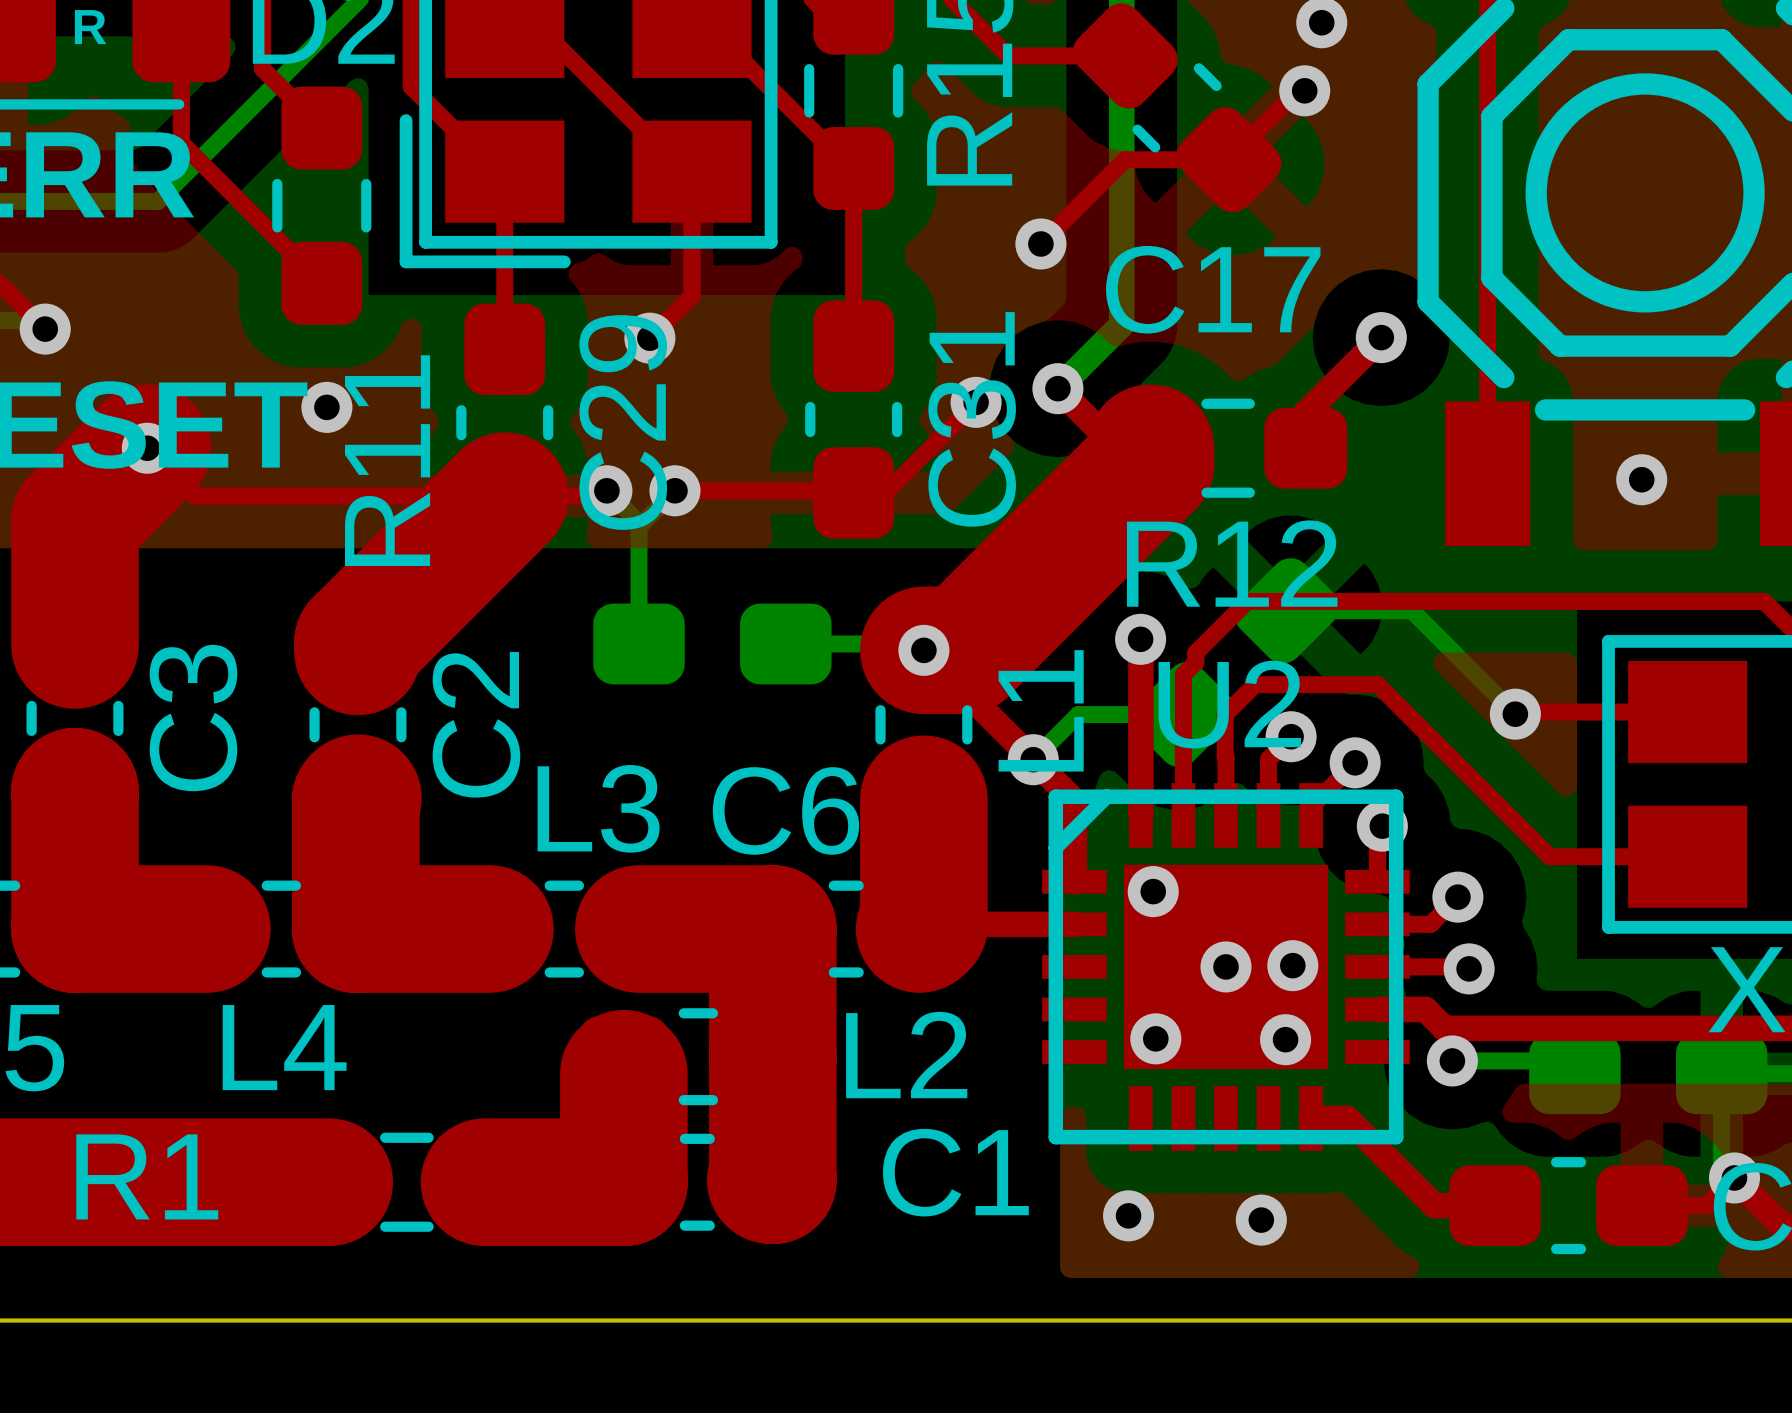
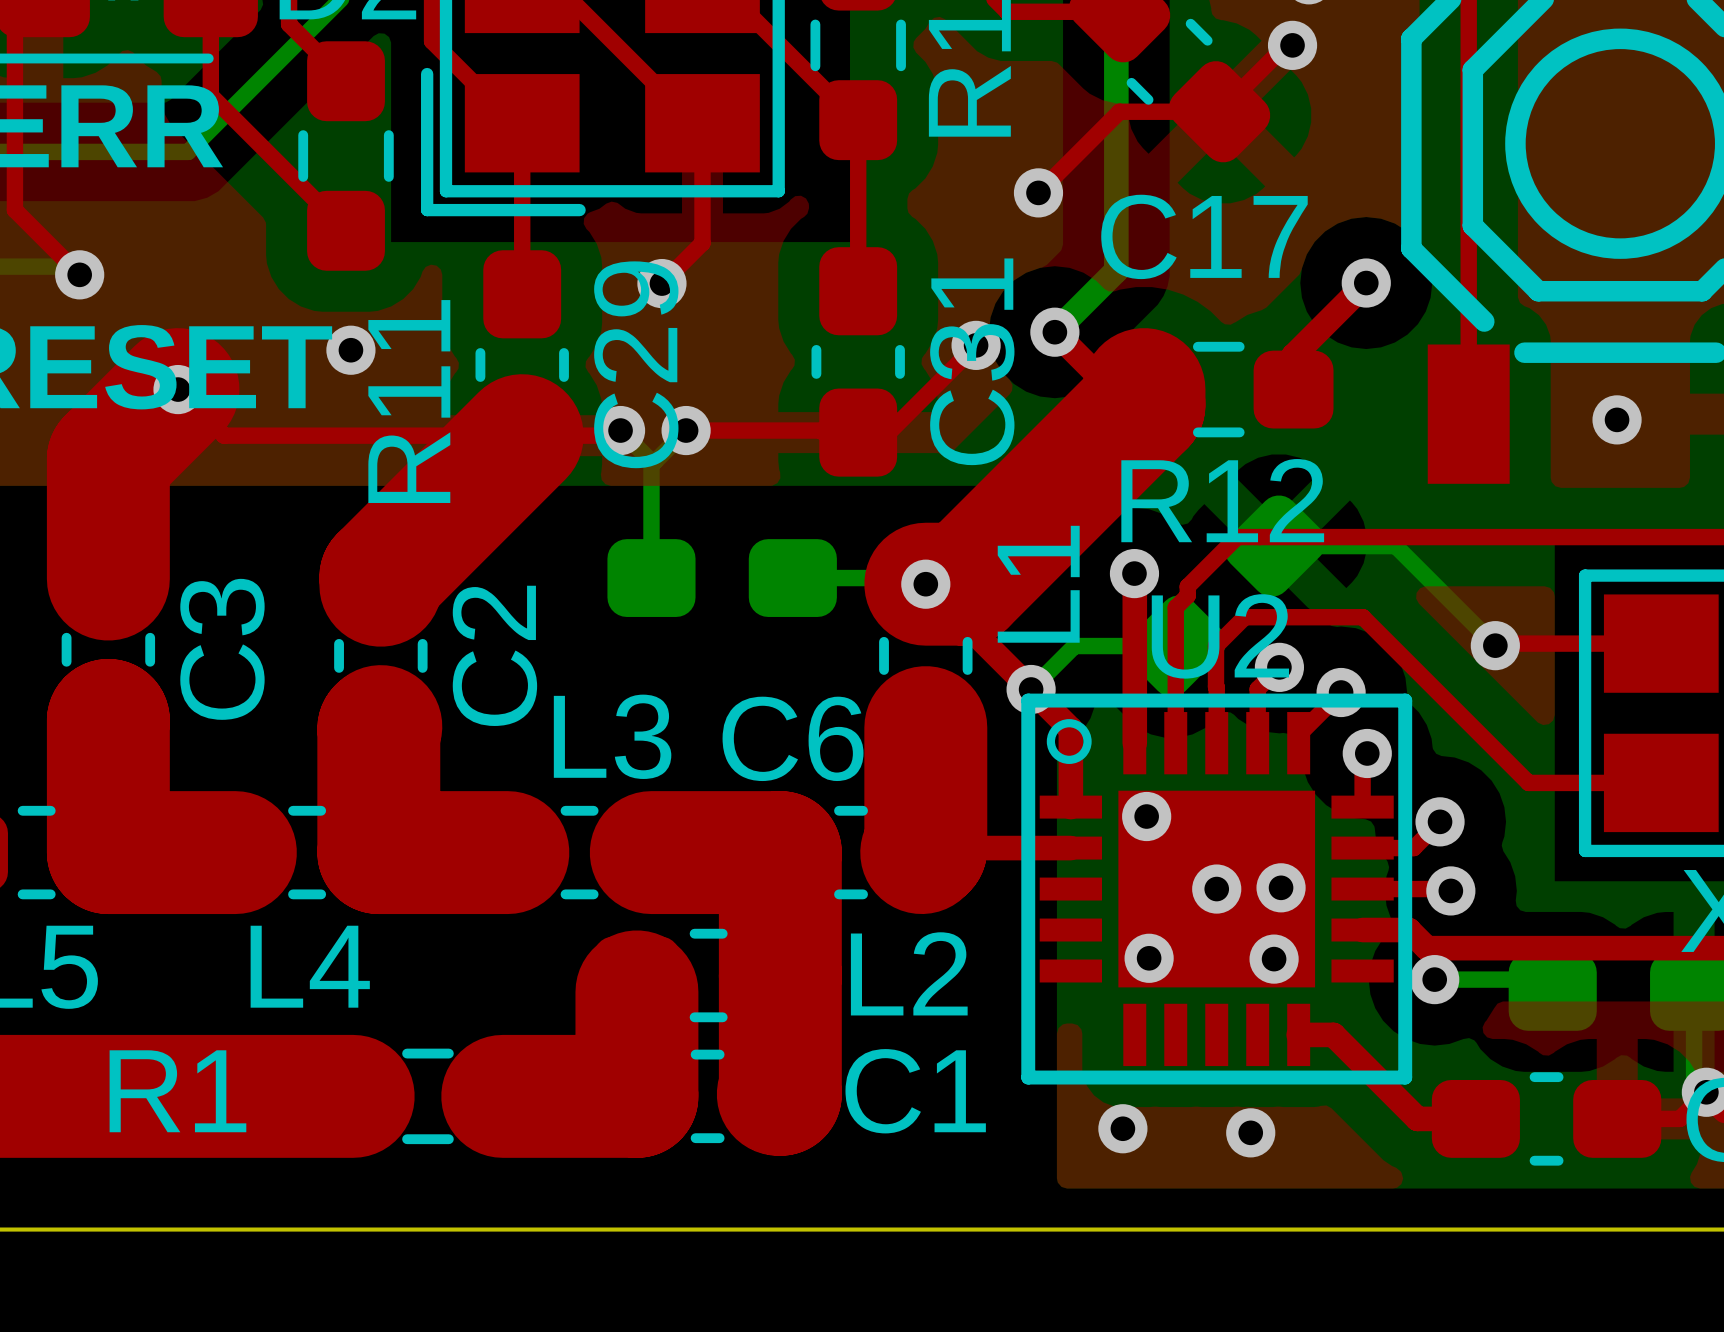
L1 name position: L1 (1041, 710) -> L1 (1038, 584)
U2 footprint: [1042, 783, 1410, 1151] -> [1021, 693, 1413, 1085]
C1 name position: C1 (955, 1172) -> C1 (915, 1091)

